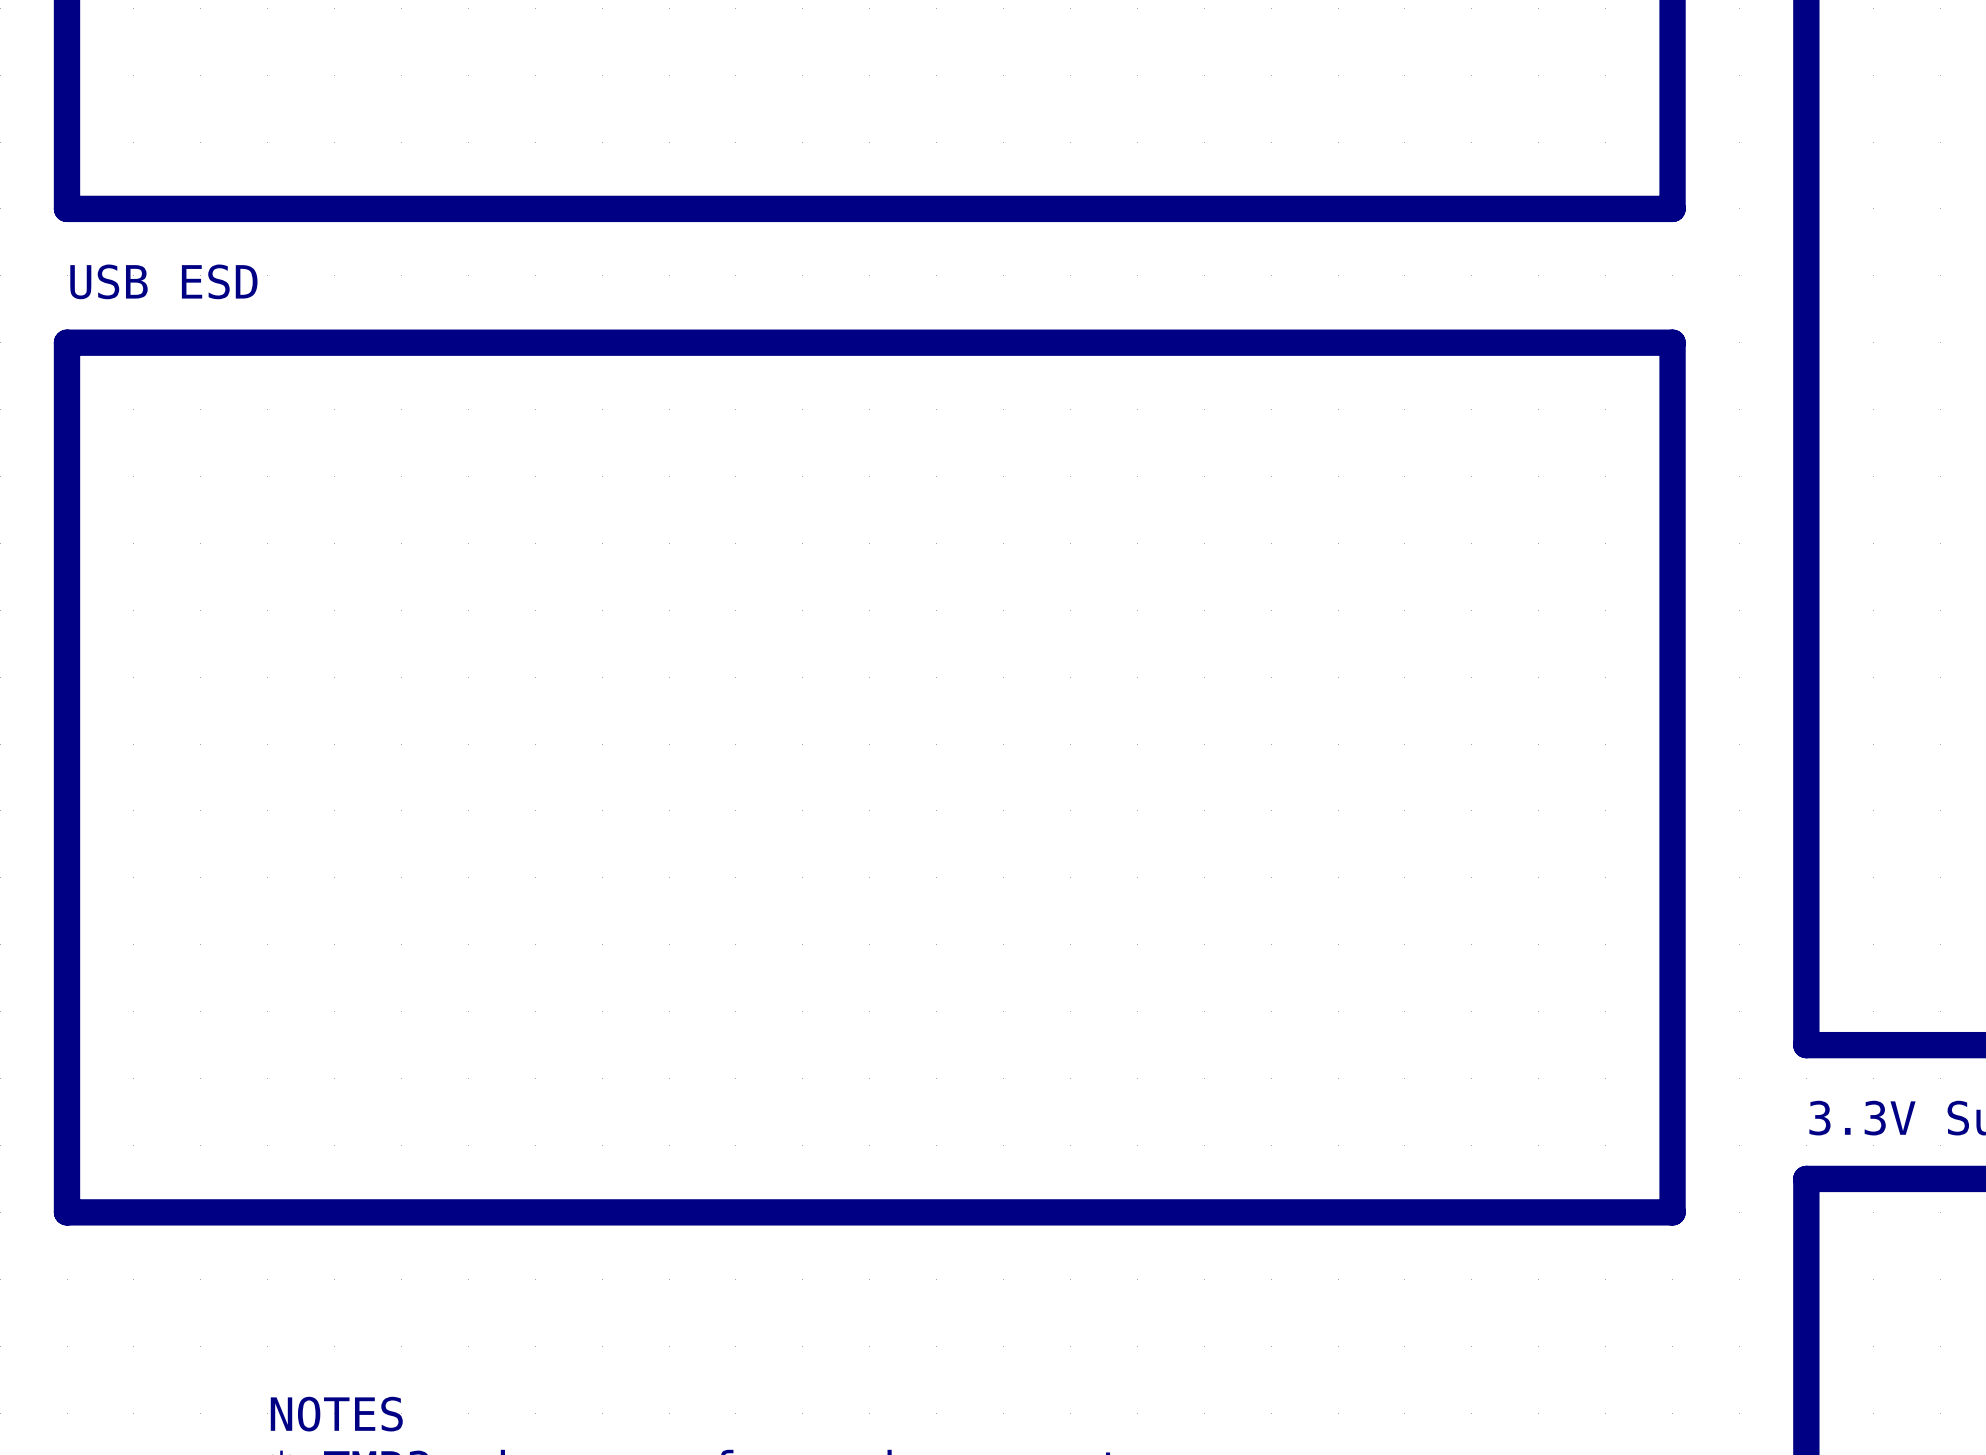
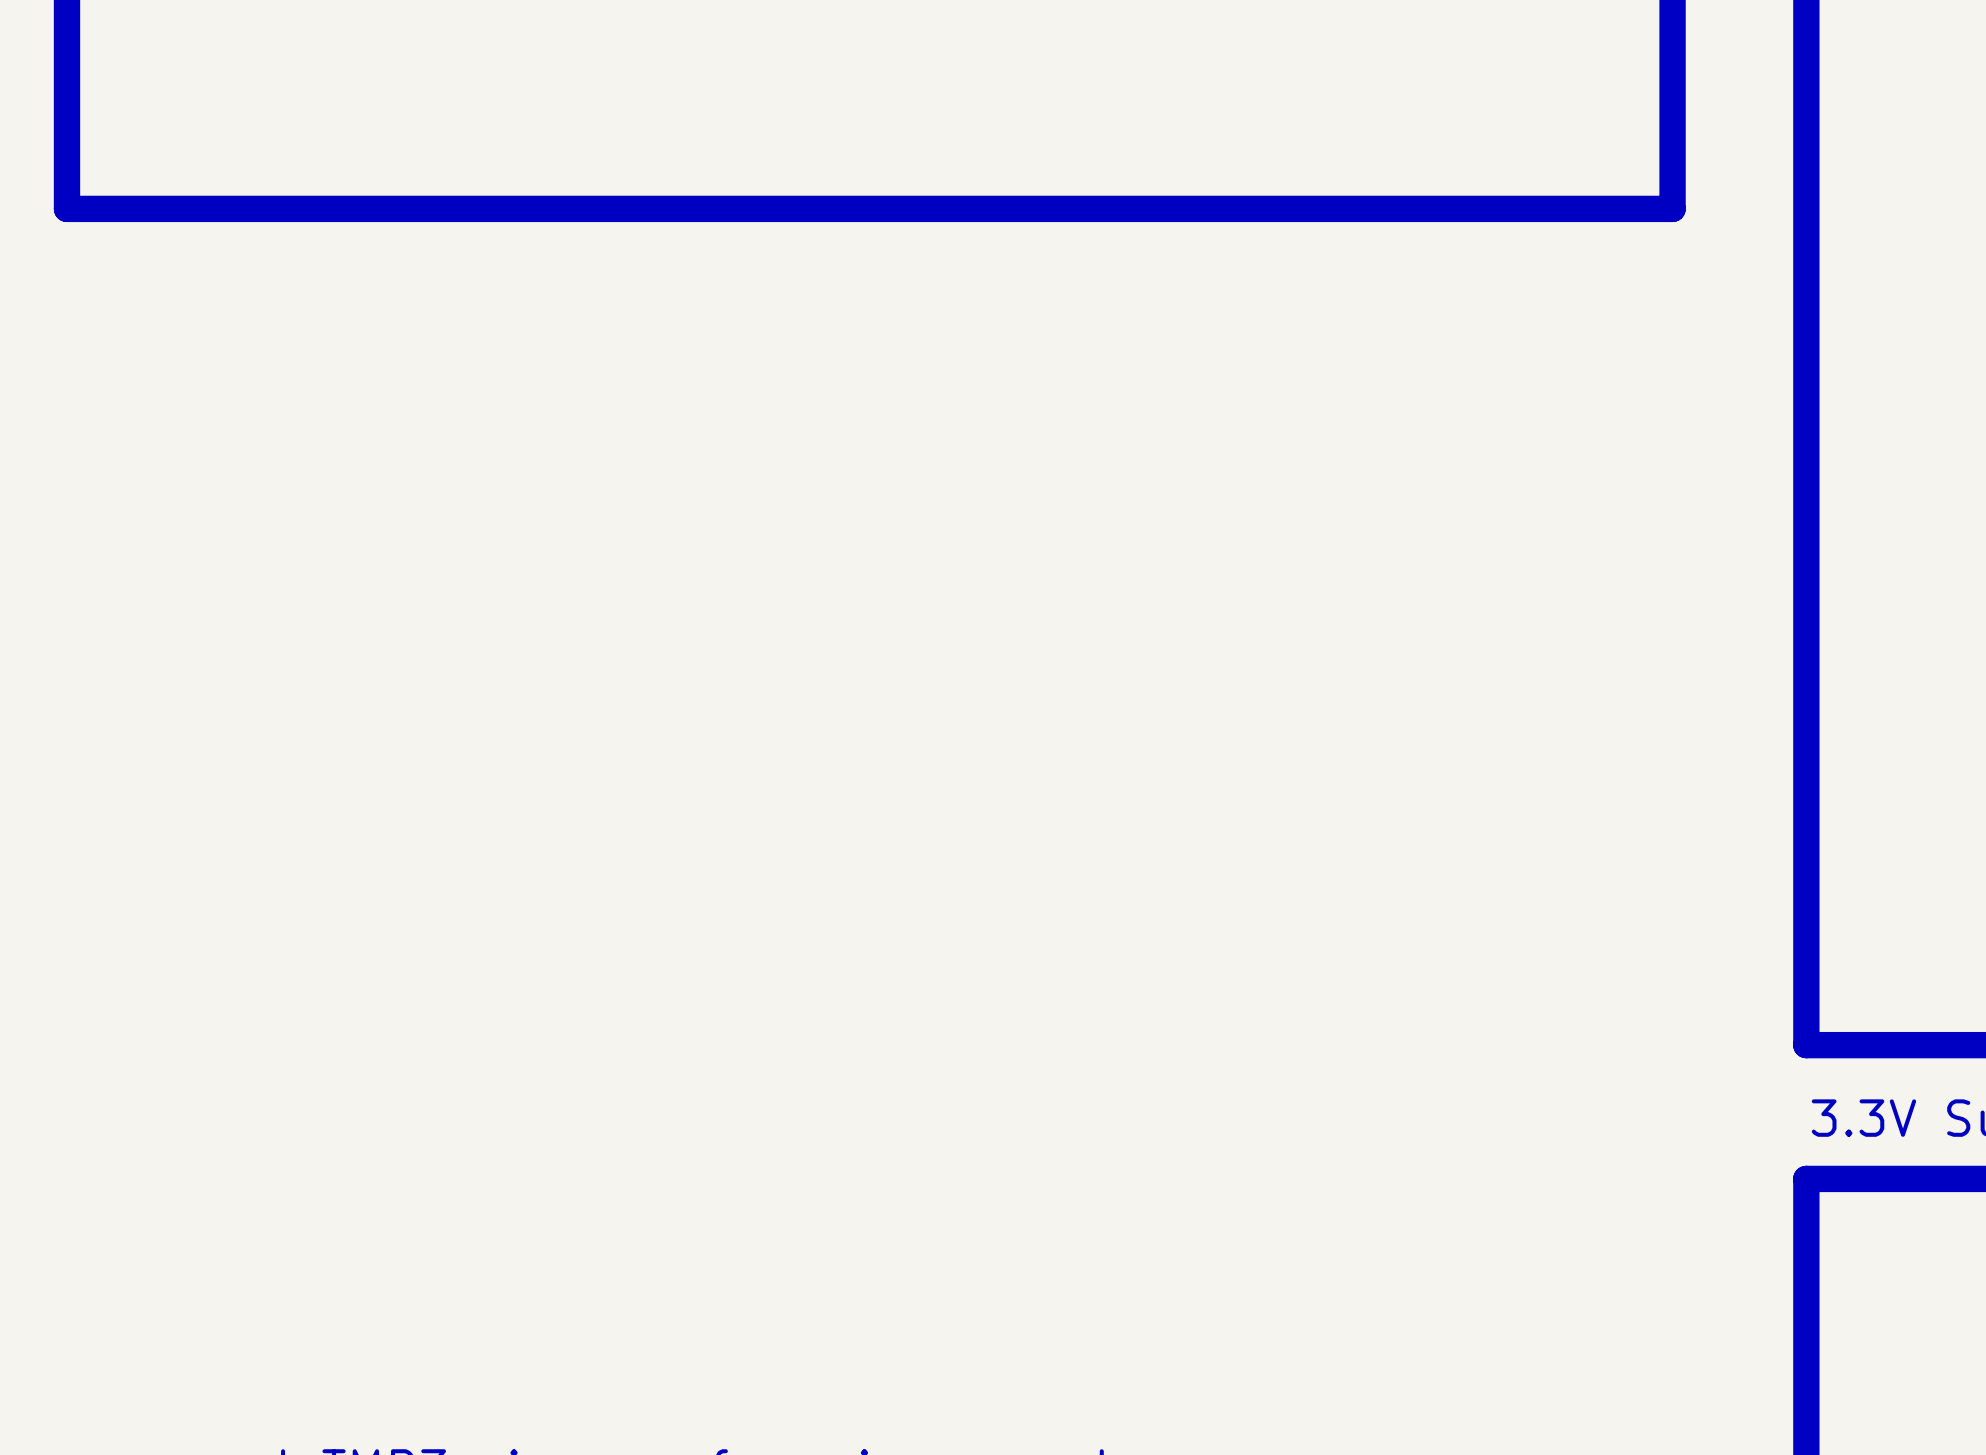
text: USB ESD (163, 281) -> none
line: (67, 342) (67, 1212) (1672, 1212) (1672, 342) (67, 342) -> none
text: NOTES (336, 1414) -> none

